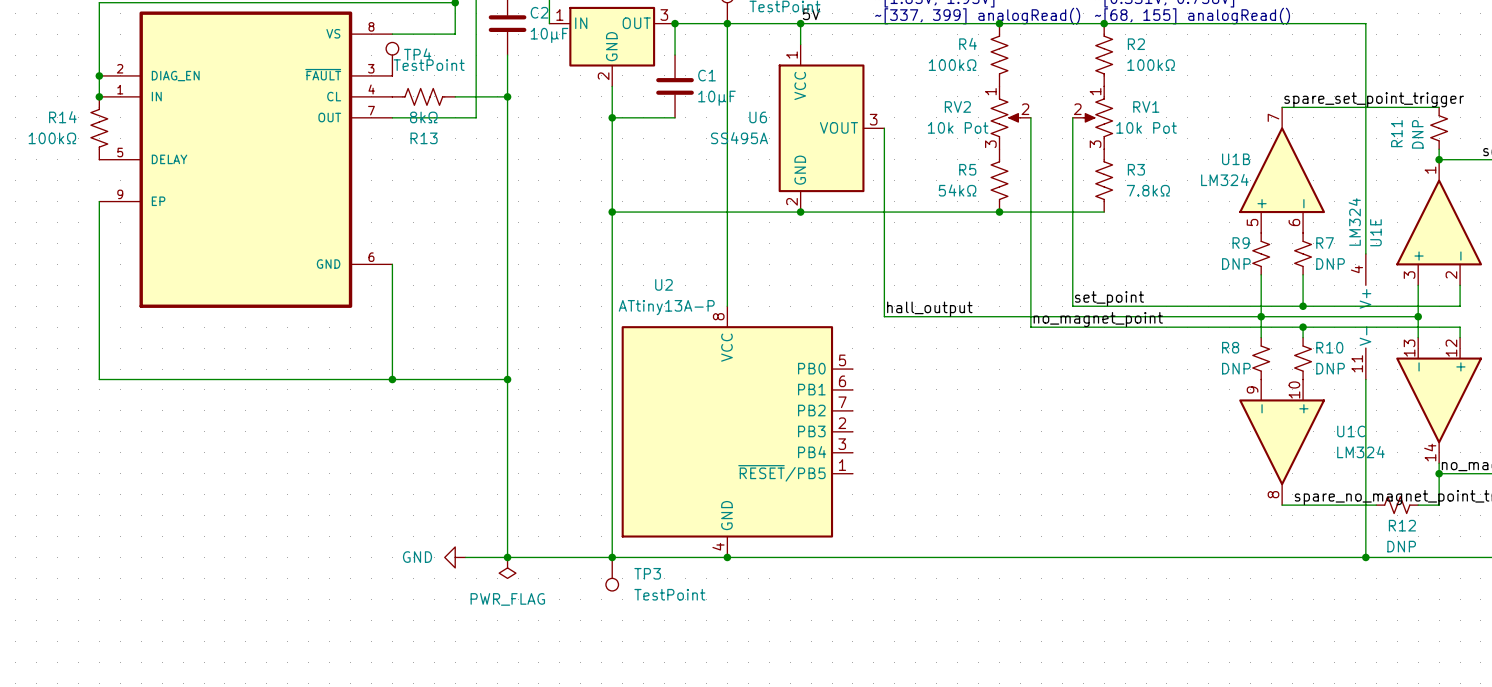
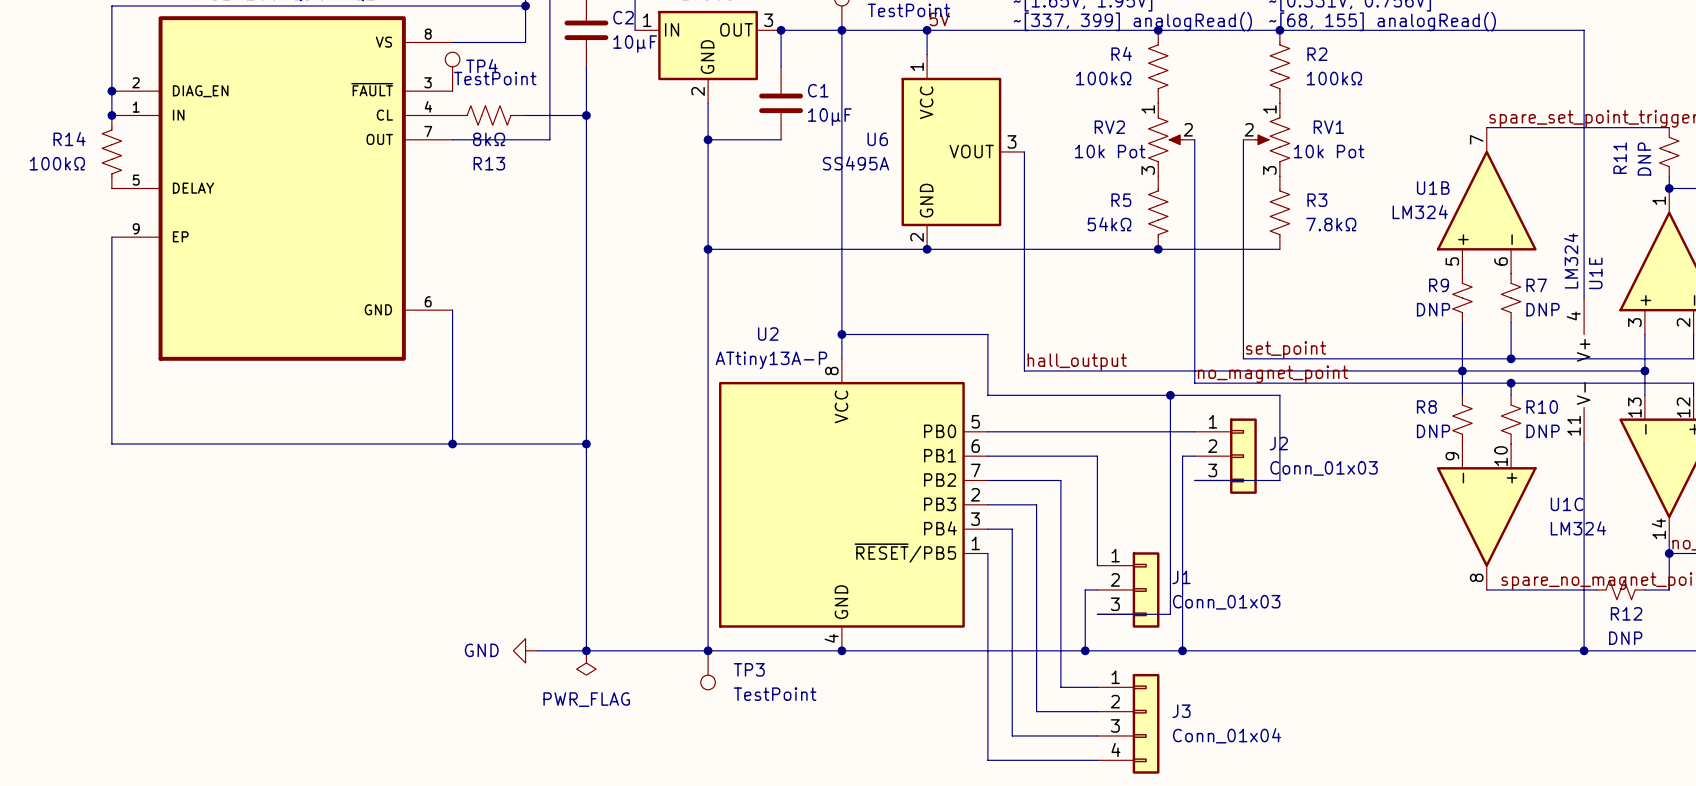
wire: none -> (841, 334) (987, 334) (987, 395) (1279, 395) (1279, 480) (1194, 480)
junction: none -> (841, 334)
wire: none -> (1170, 395) (1170, 614) (1097, 614)
junction: none -> (1170, 395)
wire: none -> (987, 431) (1194, 431)
wire: none -> (987, 456) (1097, 456) (1097, 565)
wire: none -> (1194, 456) (1182, 456) (1182, 650)
J2: none -> Conn_01x03 (1225, 456)
wire: none -> (987, 480) (1060, 480) (1060, 687) (1097, 687)
wire: none -> (987, 504) (1036, 504) (1036, 711) (1097, 711)
wire: none -> (987, 529) (1012, 529) (1012, 735) (1097, 735)
wire: none -> (987, 553) (987, 760) (1097, 760)
wire: none -> (1097, 589) (1085, 589) (1085, 650)
J1: none -> Conn_01x03 (1128, 589)
junction: none -> (1085, 650)
junction: none -> (1182, 650)
J3: none -> Conn_01x04 (1128, 723)

